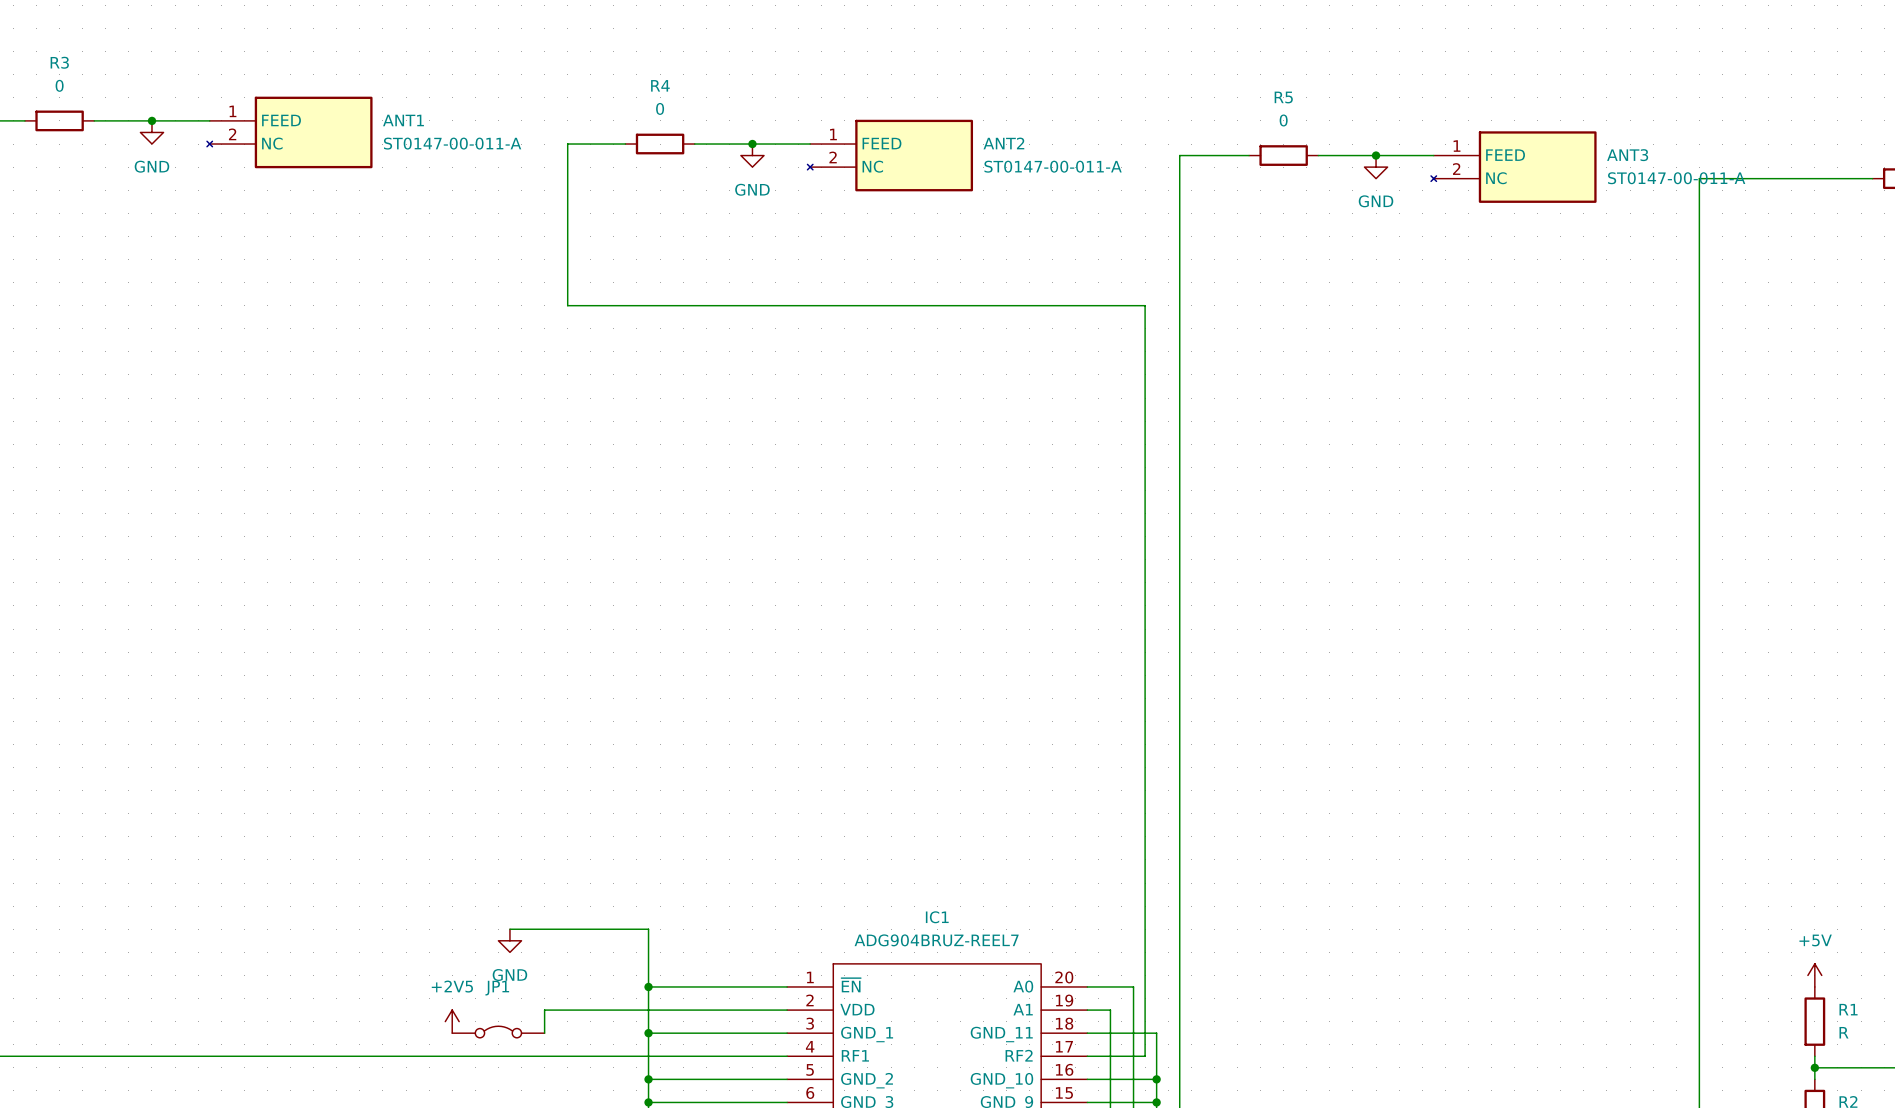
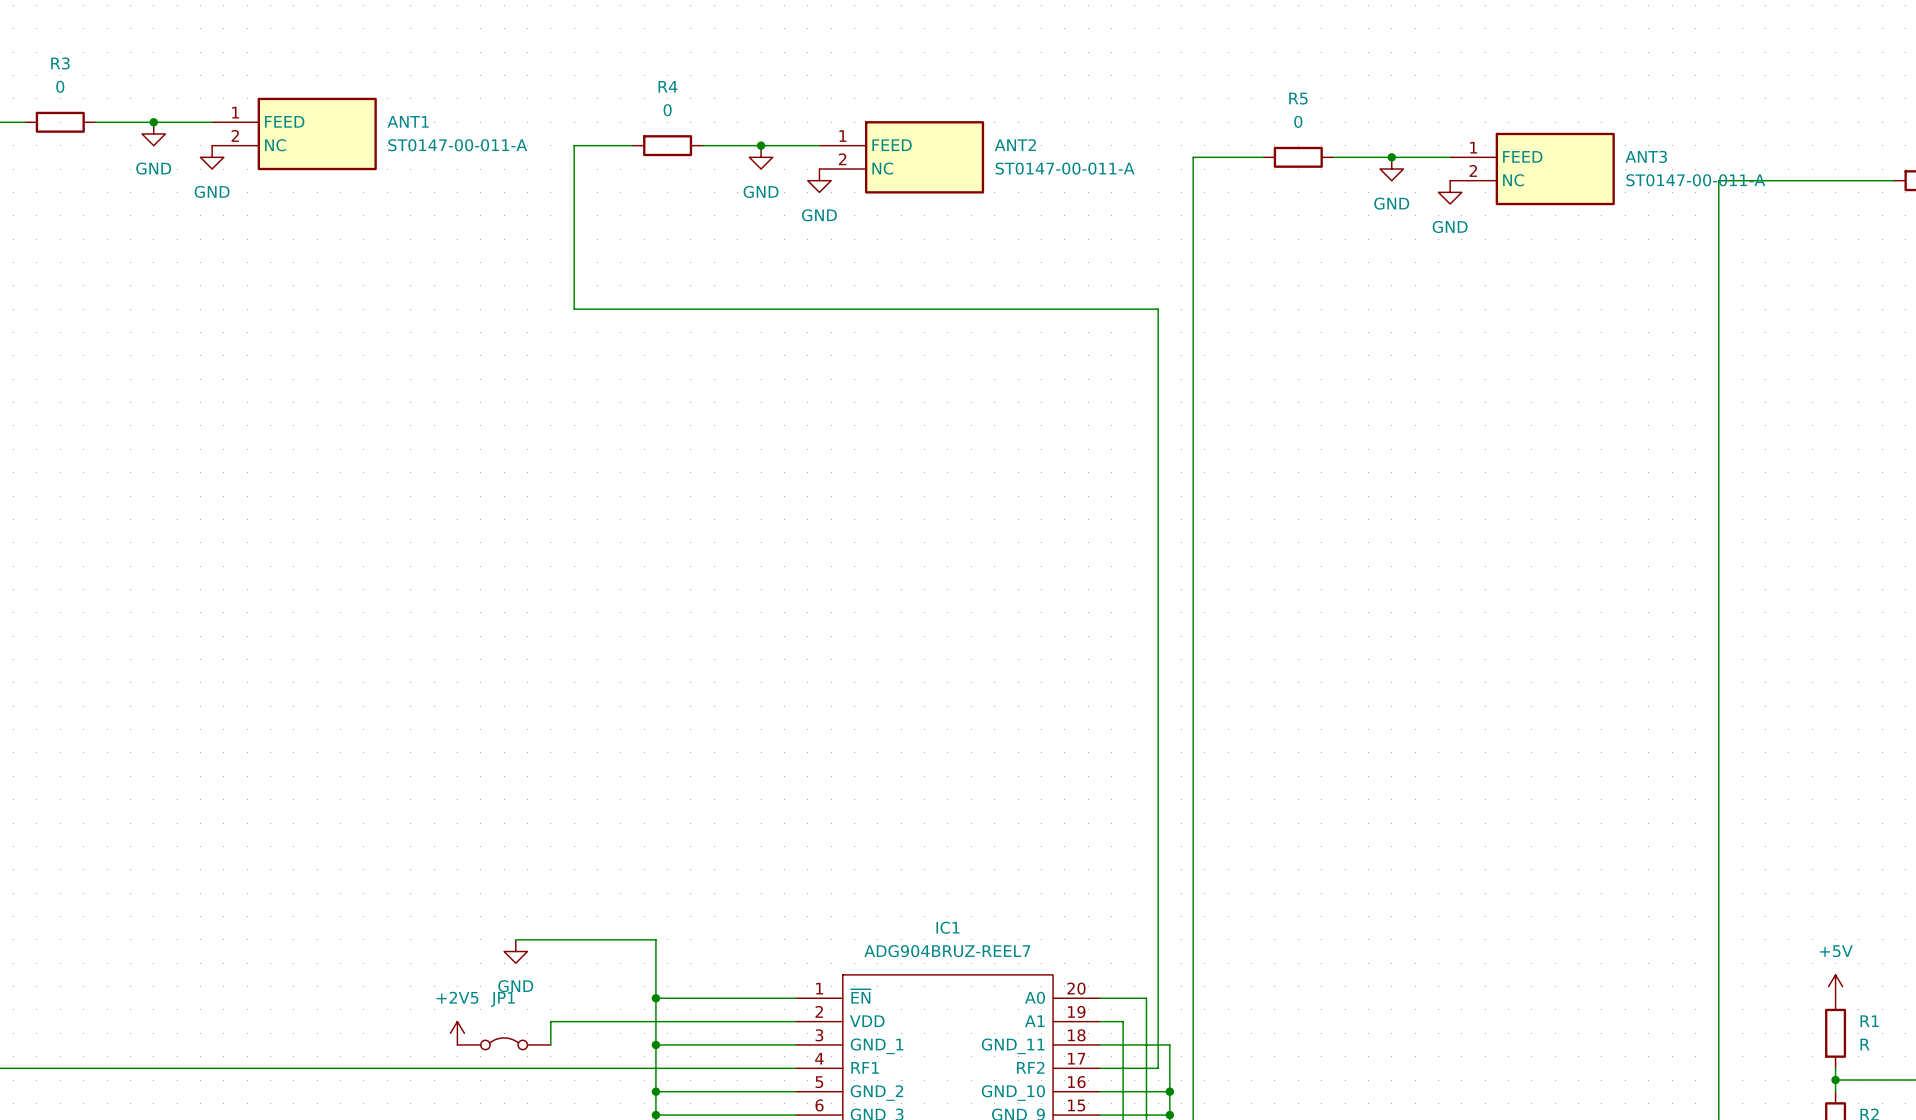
ANT1 symbol: [207, 96, 373, 169] -> [212, 97, 377, 171]
ANT2 symbol: [807, 119, 974, 192] -> [819, 121, 985, 194]
ANT3 symbol: [1431, 131, 1597, 203] -> [1450, 132, 1615, 206]
power symbol: none -> GND (212, 157)
power symbol: none -> GND (819, 180)
power symbol: none -> GND (1450, 192)

